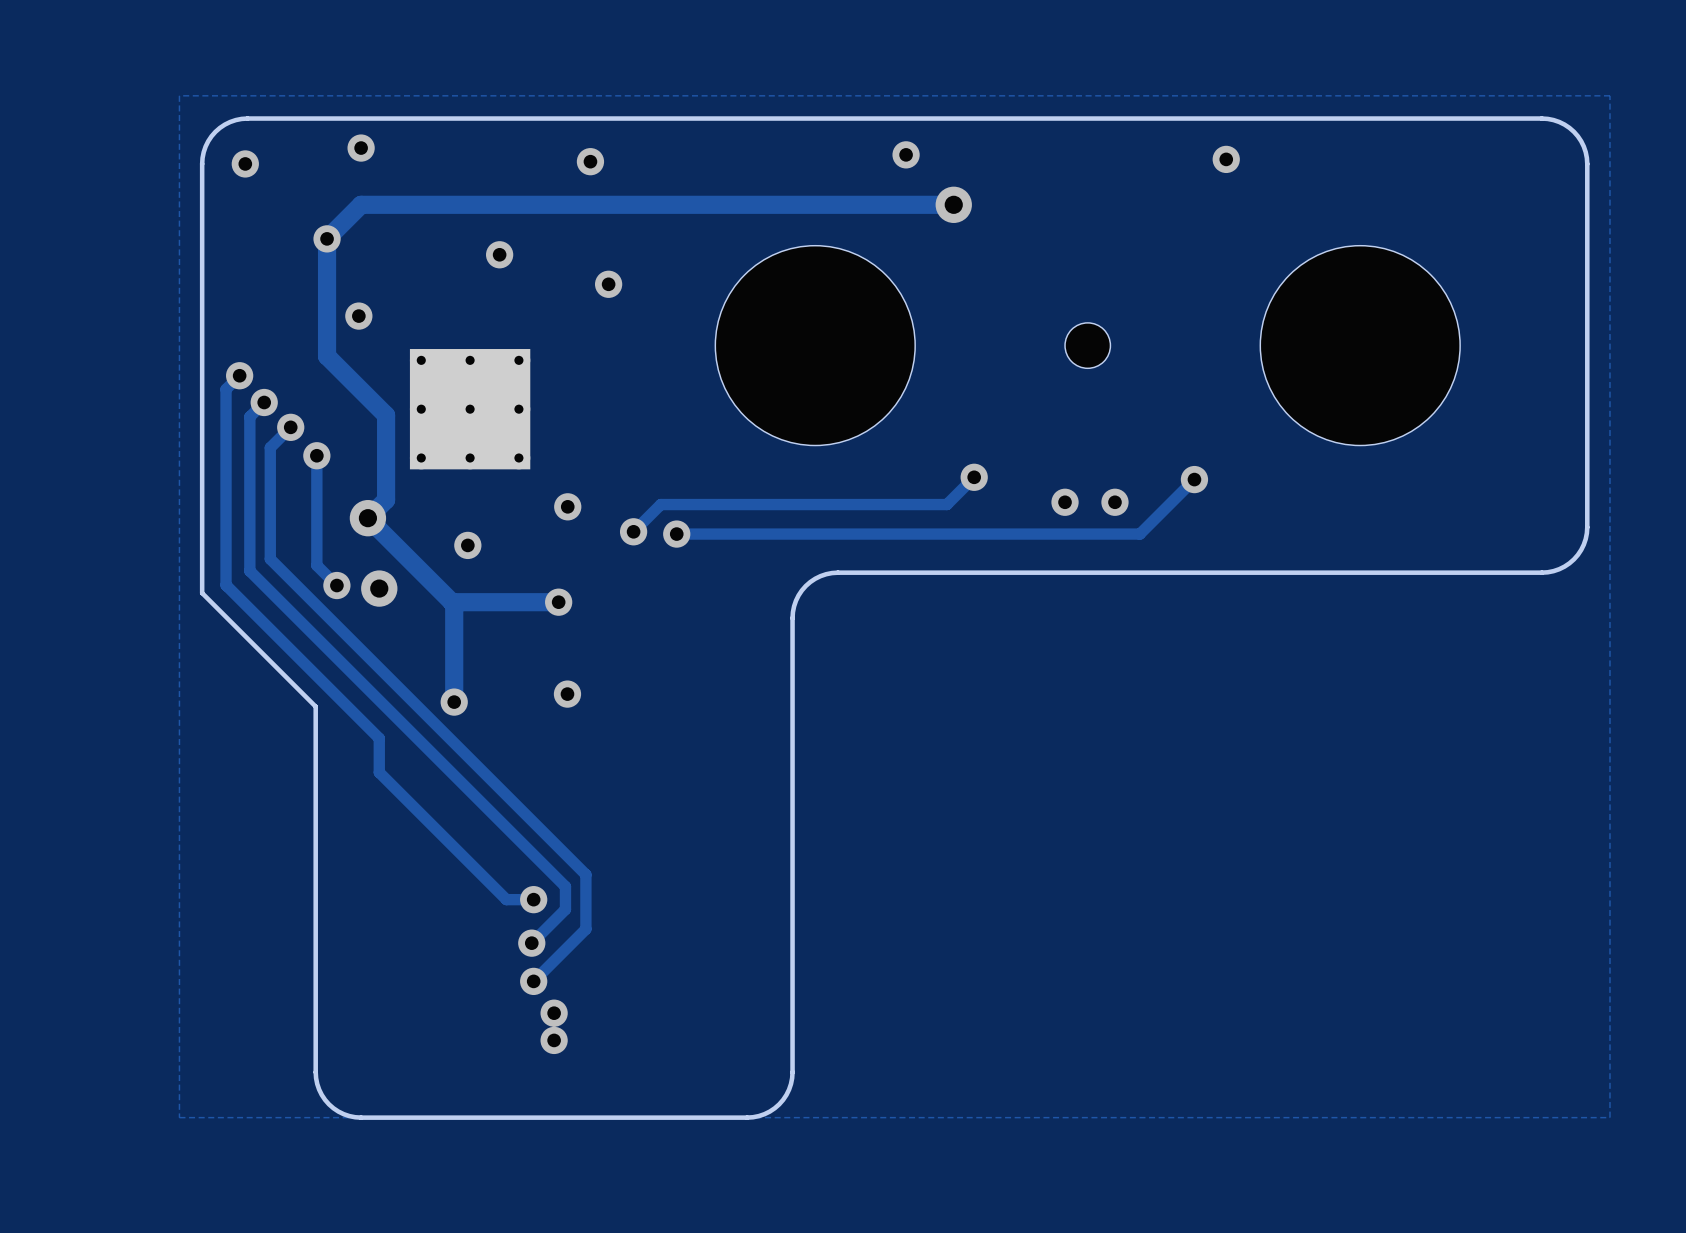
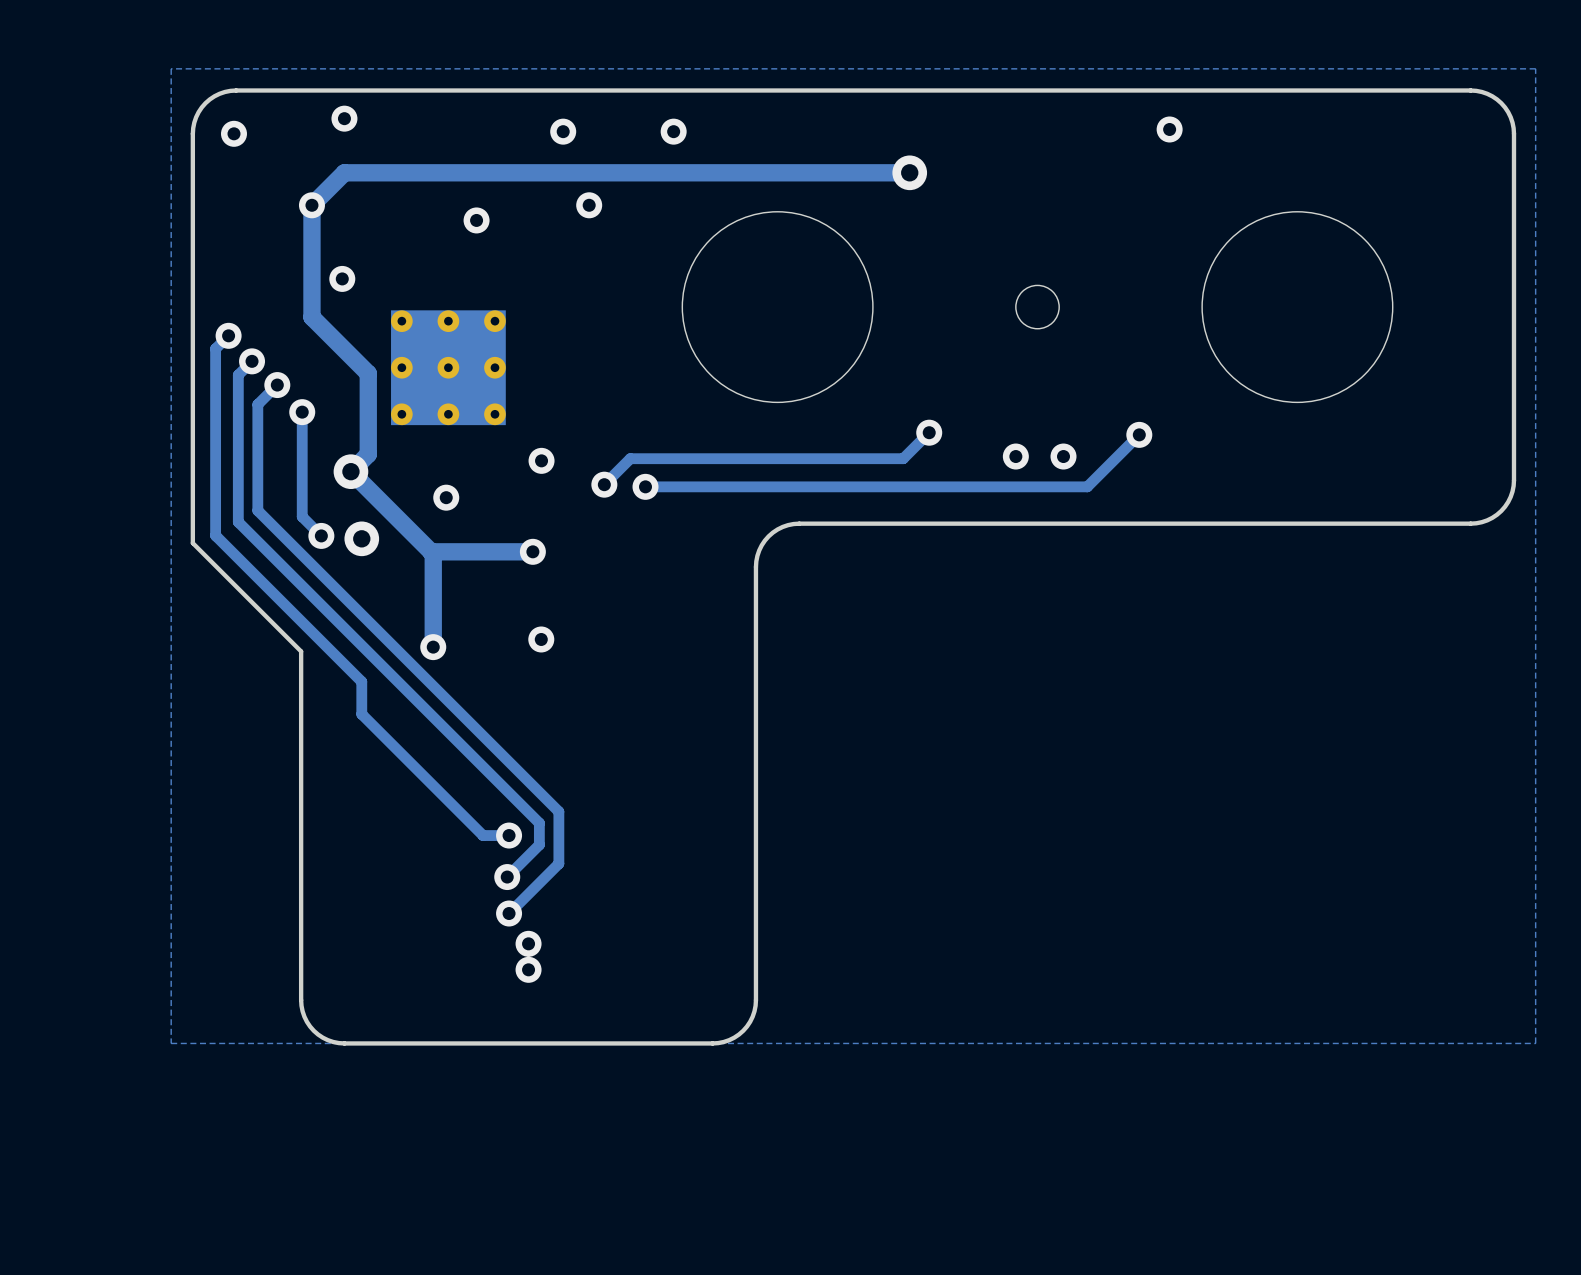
via: (906, 154) -> none
via: none -> (673, 131)
via position: (608, 284) -> (589, 205)

